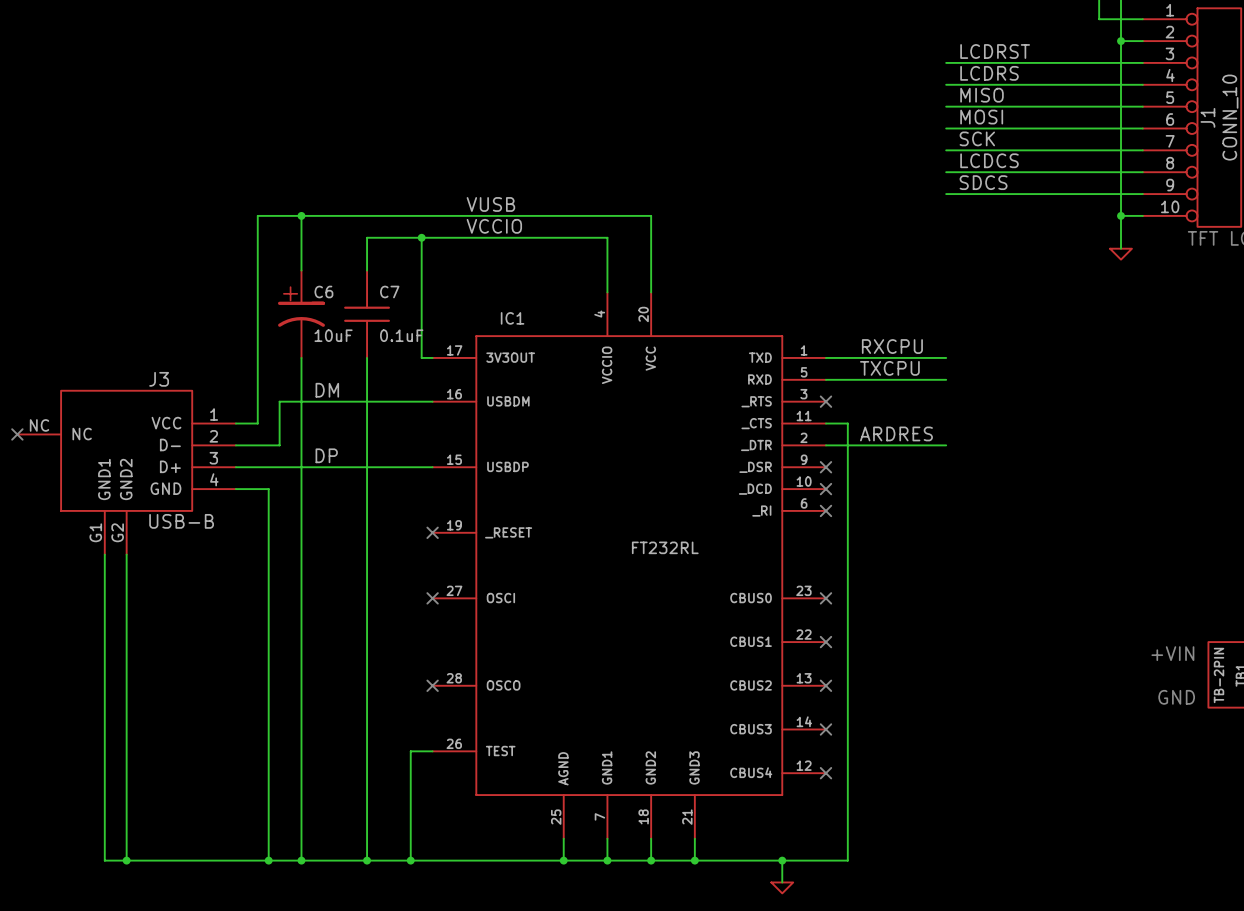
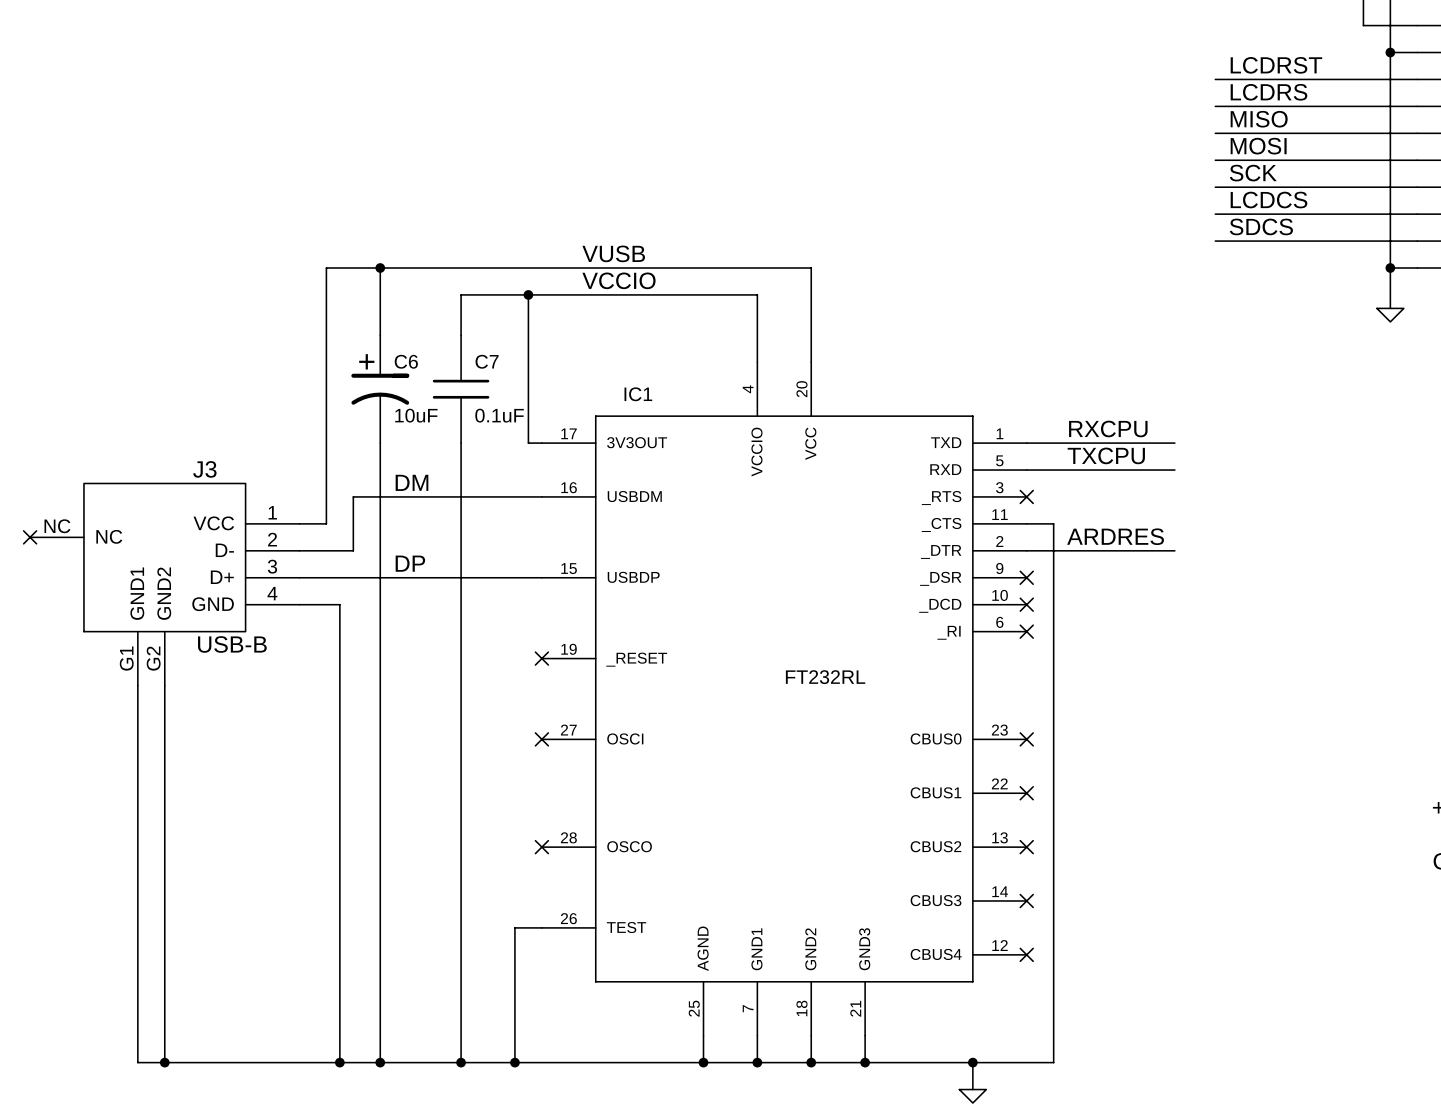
label position: LCDRST (995, 51) -> LCDRST (1276, 65)
wire: (946, 62) (978, 62) -> none
label position: LCDRS (989, 73) -> LCDRS (1268, 92)
wire: (946, 84) (978, 84) -> none
label position: MISO (982, 95) -> MISO (1259, 119)
wire: (946, 106) (978, 106) -> none
label position: MOSI (981, 117) -> MOSI (1258, 146)
wire: (946, 128) (978, 128) -> none
label position: SCK (977, 138) -> SCK (1253, 173)
wire: (946, 150) (978, 150) -> none
label position: LCDCS (989, 160) -> LCDCS (1268, 200)
wire: (946, 172) (978, 172) -> none
label position: SDCS (983, 182) -> SDCS (1261, 226)
wire: (946, 194) (978, 194) -> none

